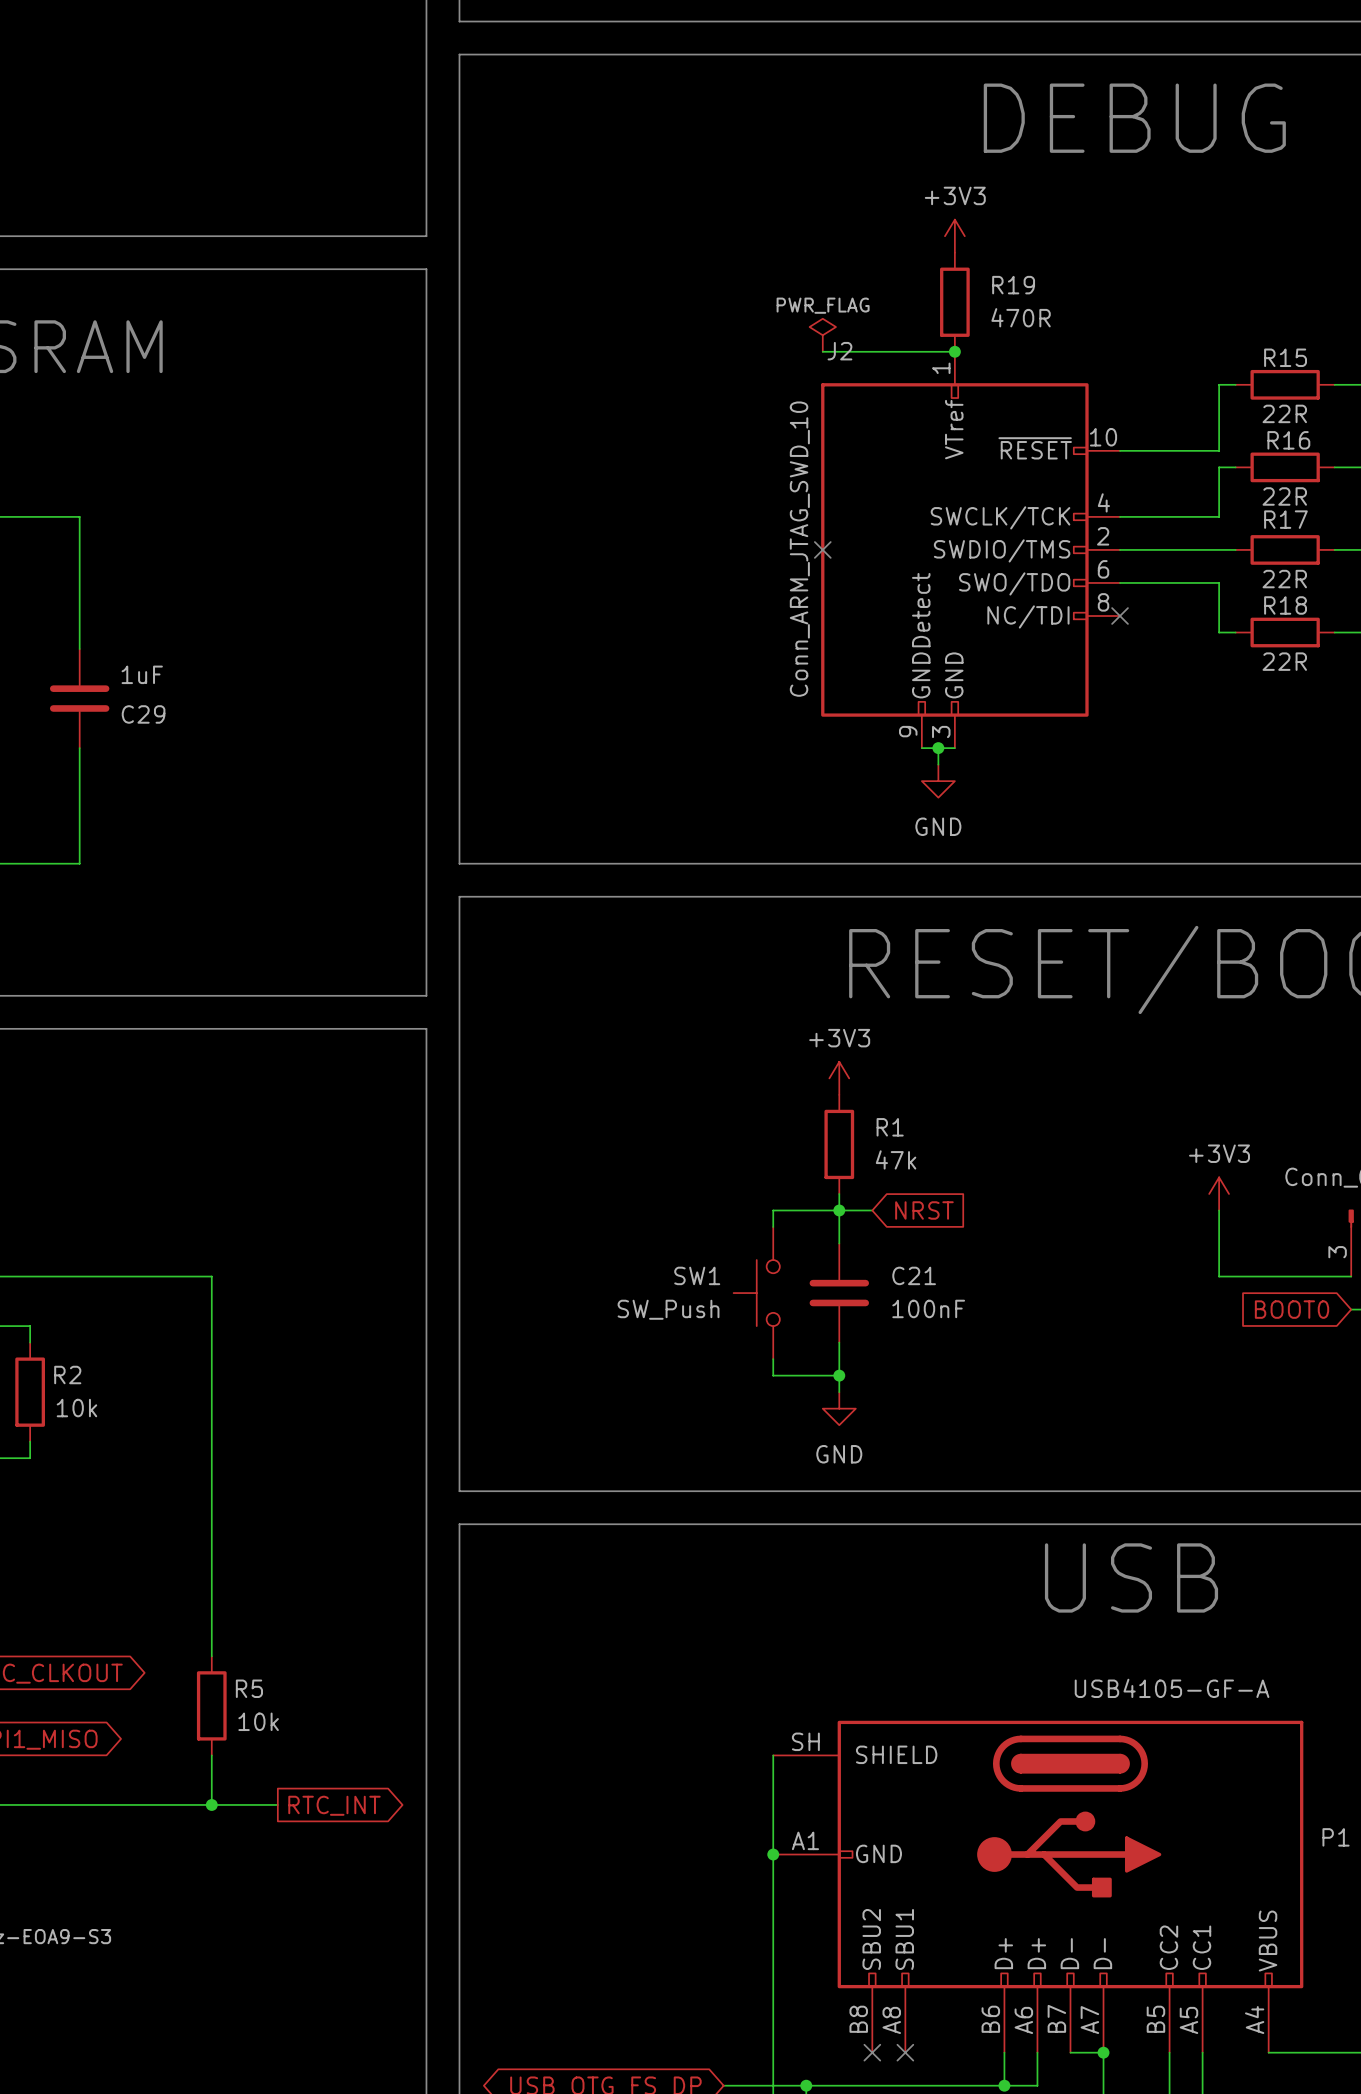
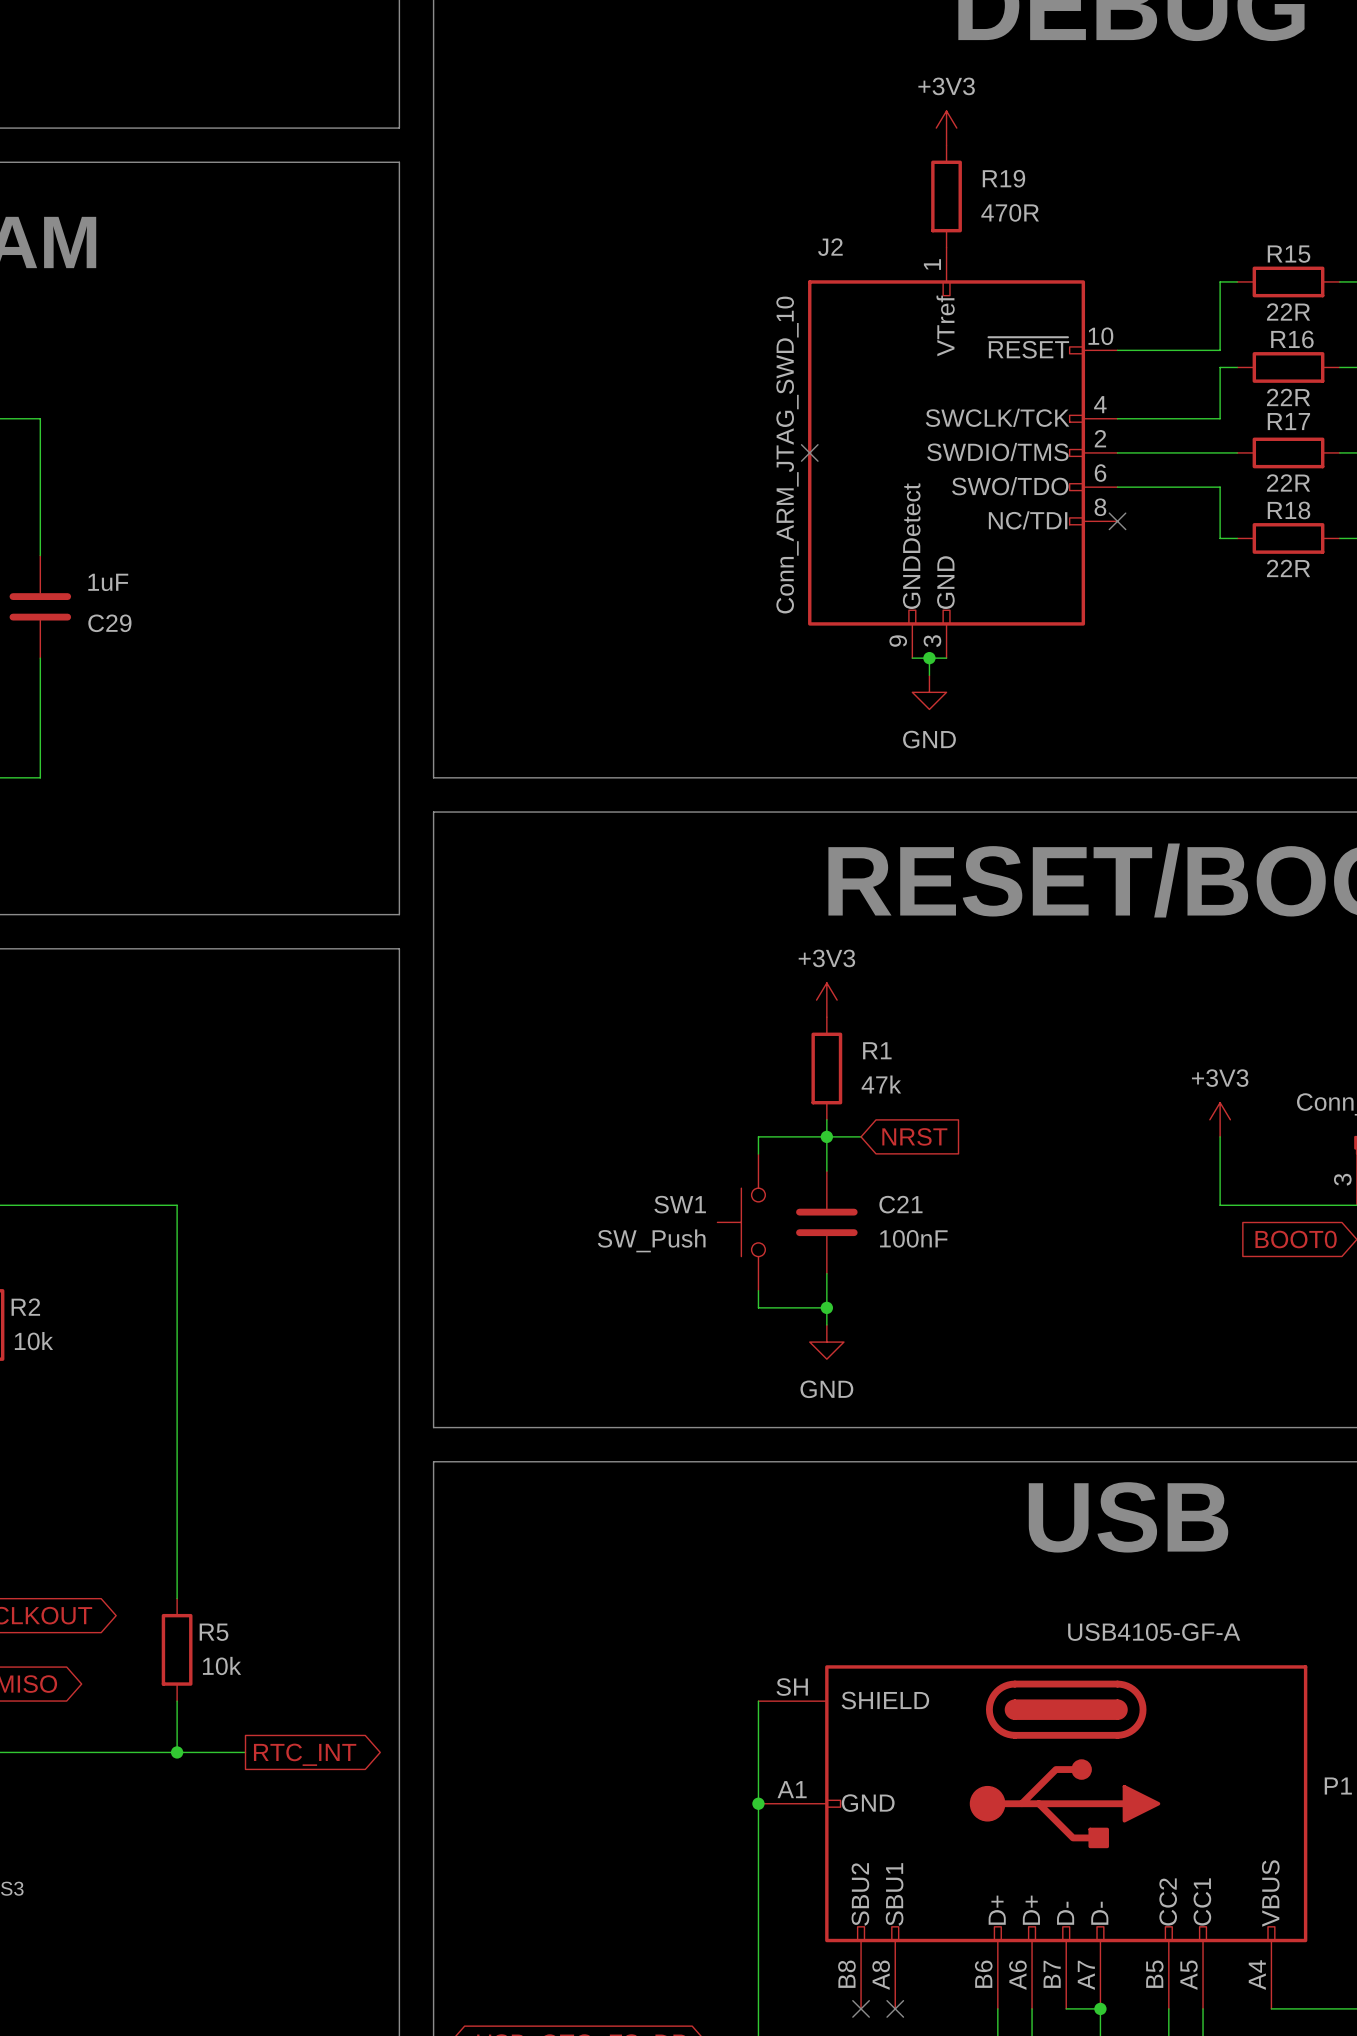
power symbol: PWR_FLAG (822, 335) -> none
wire: (822, 351) (954, 351) -> none
junction: (954, 351) -> none

